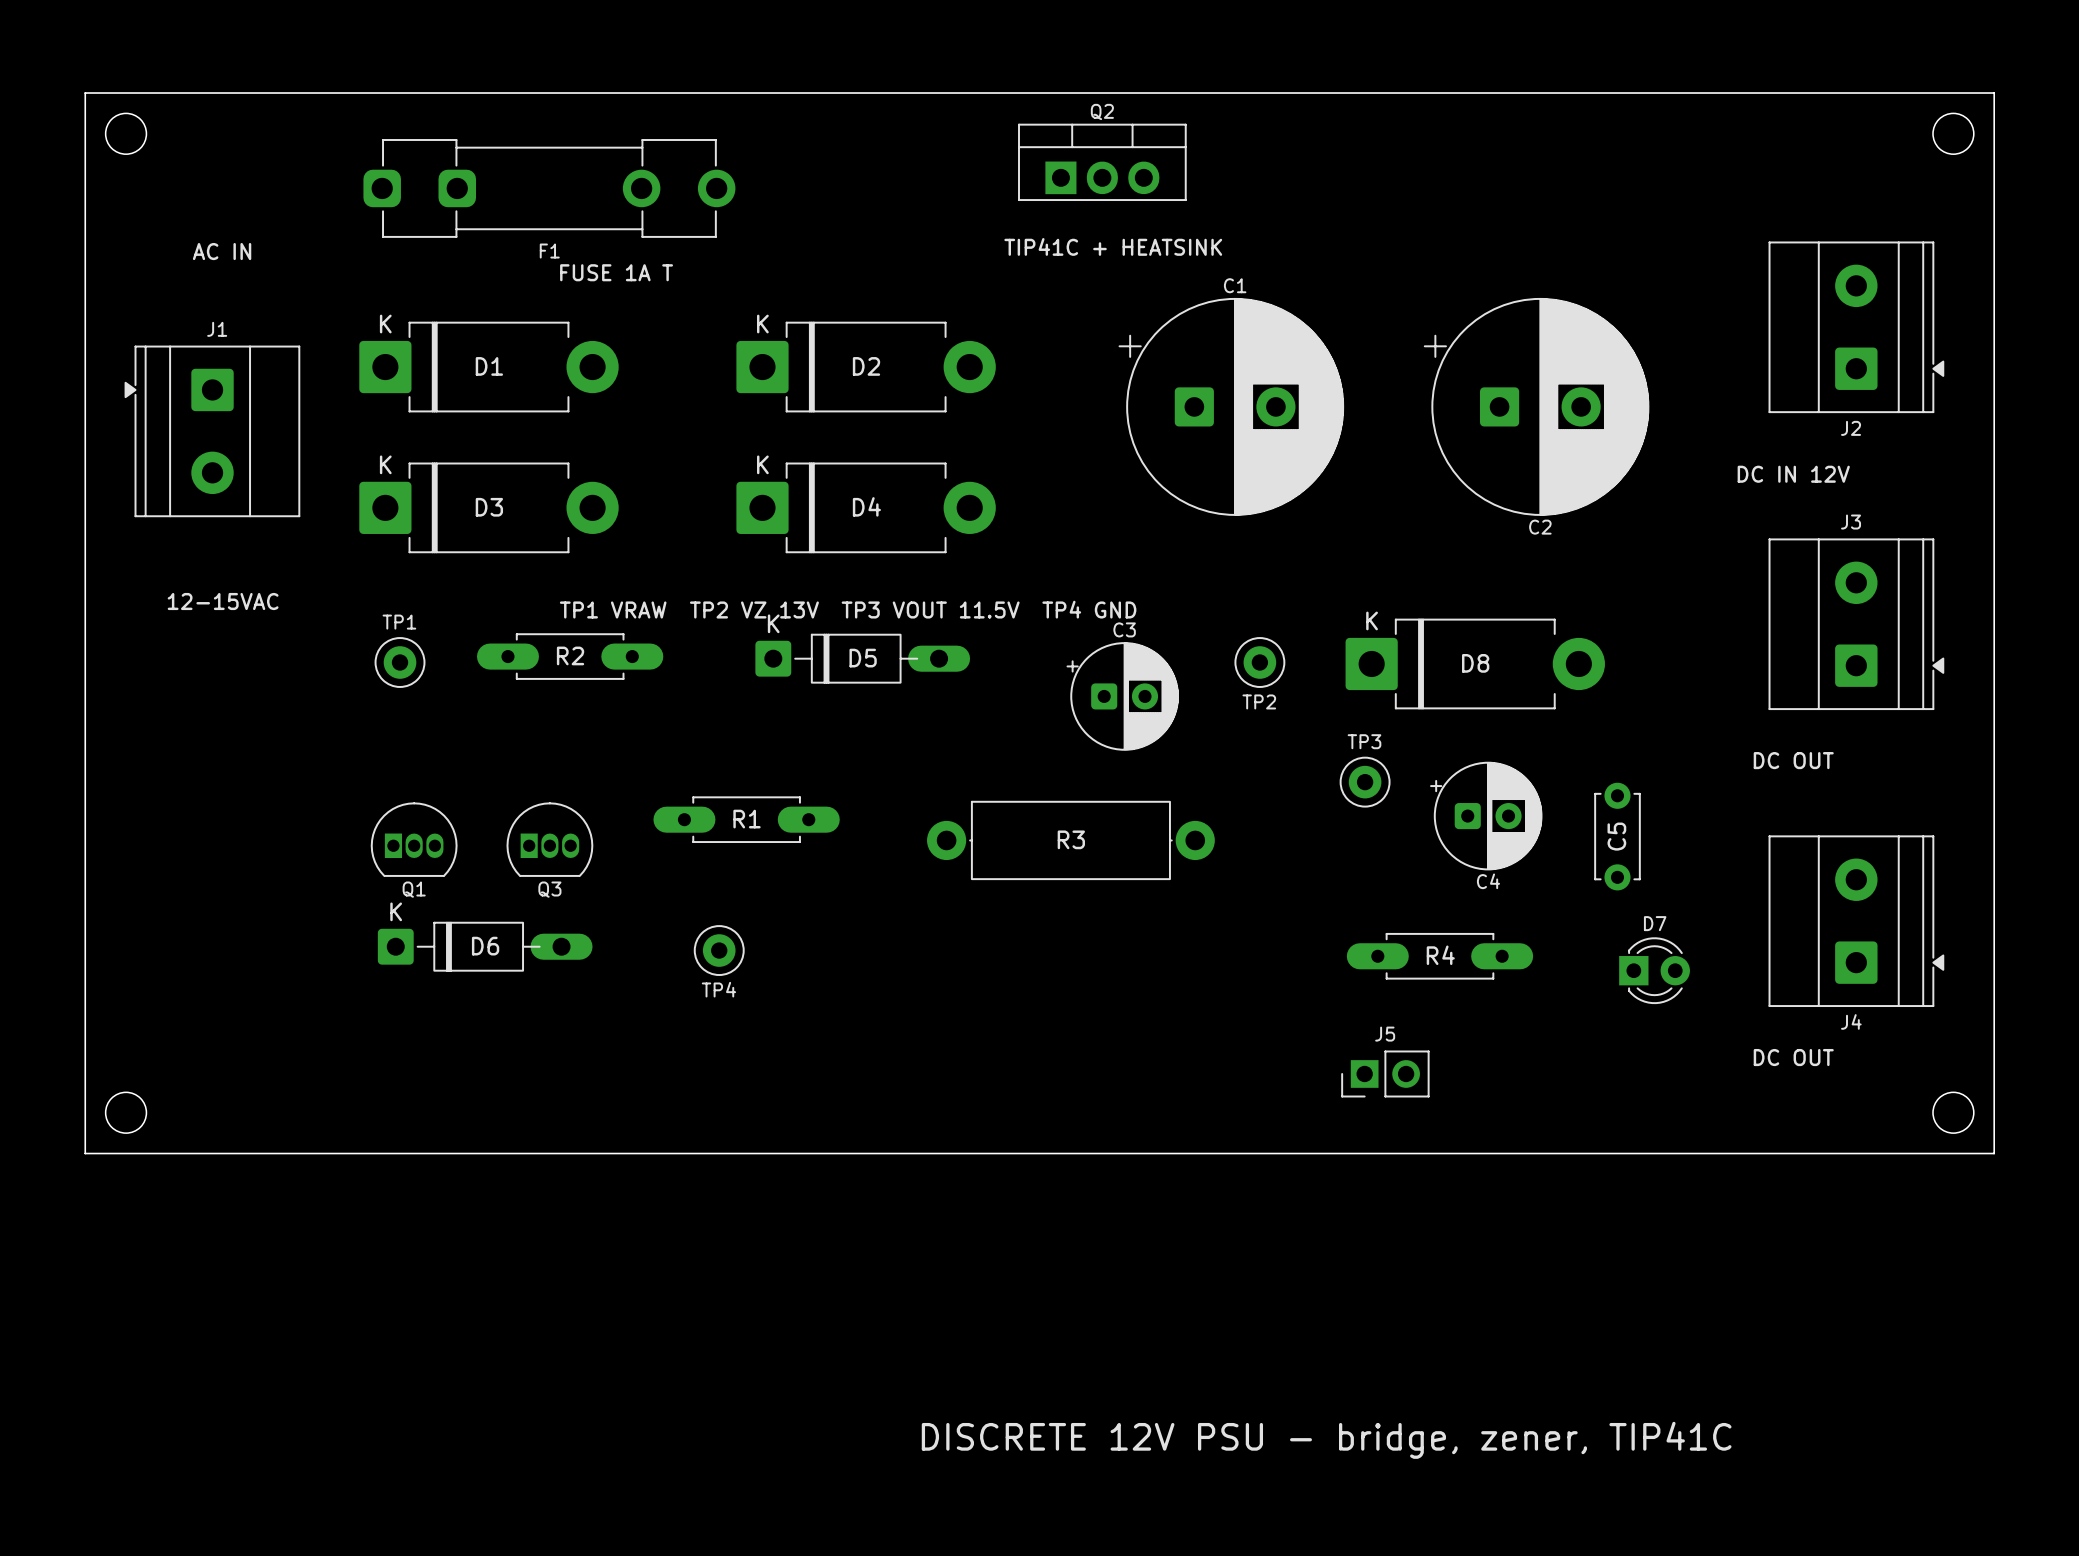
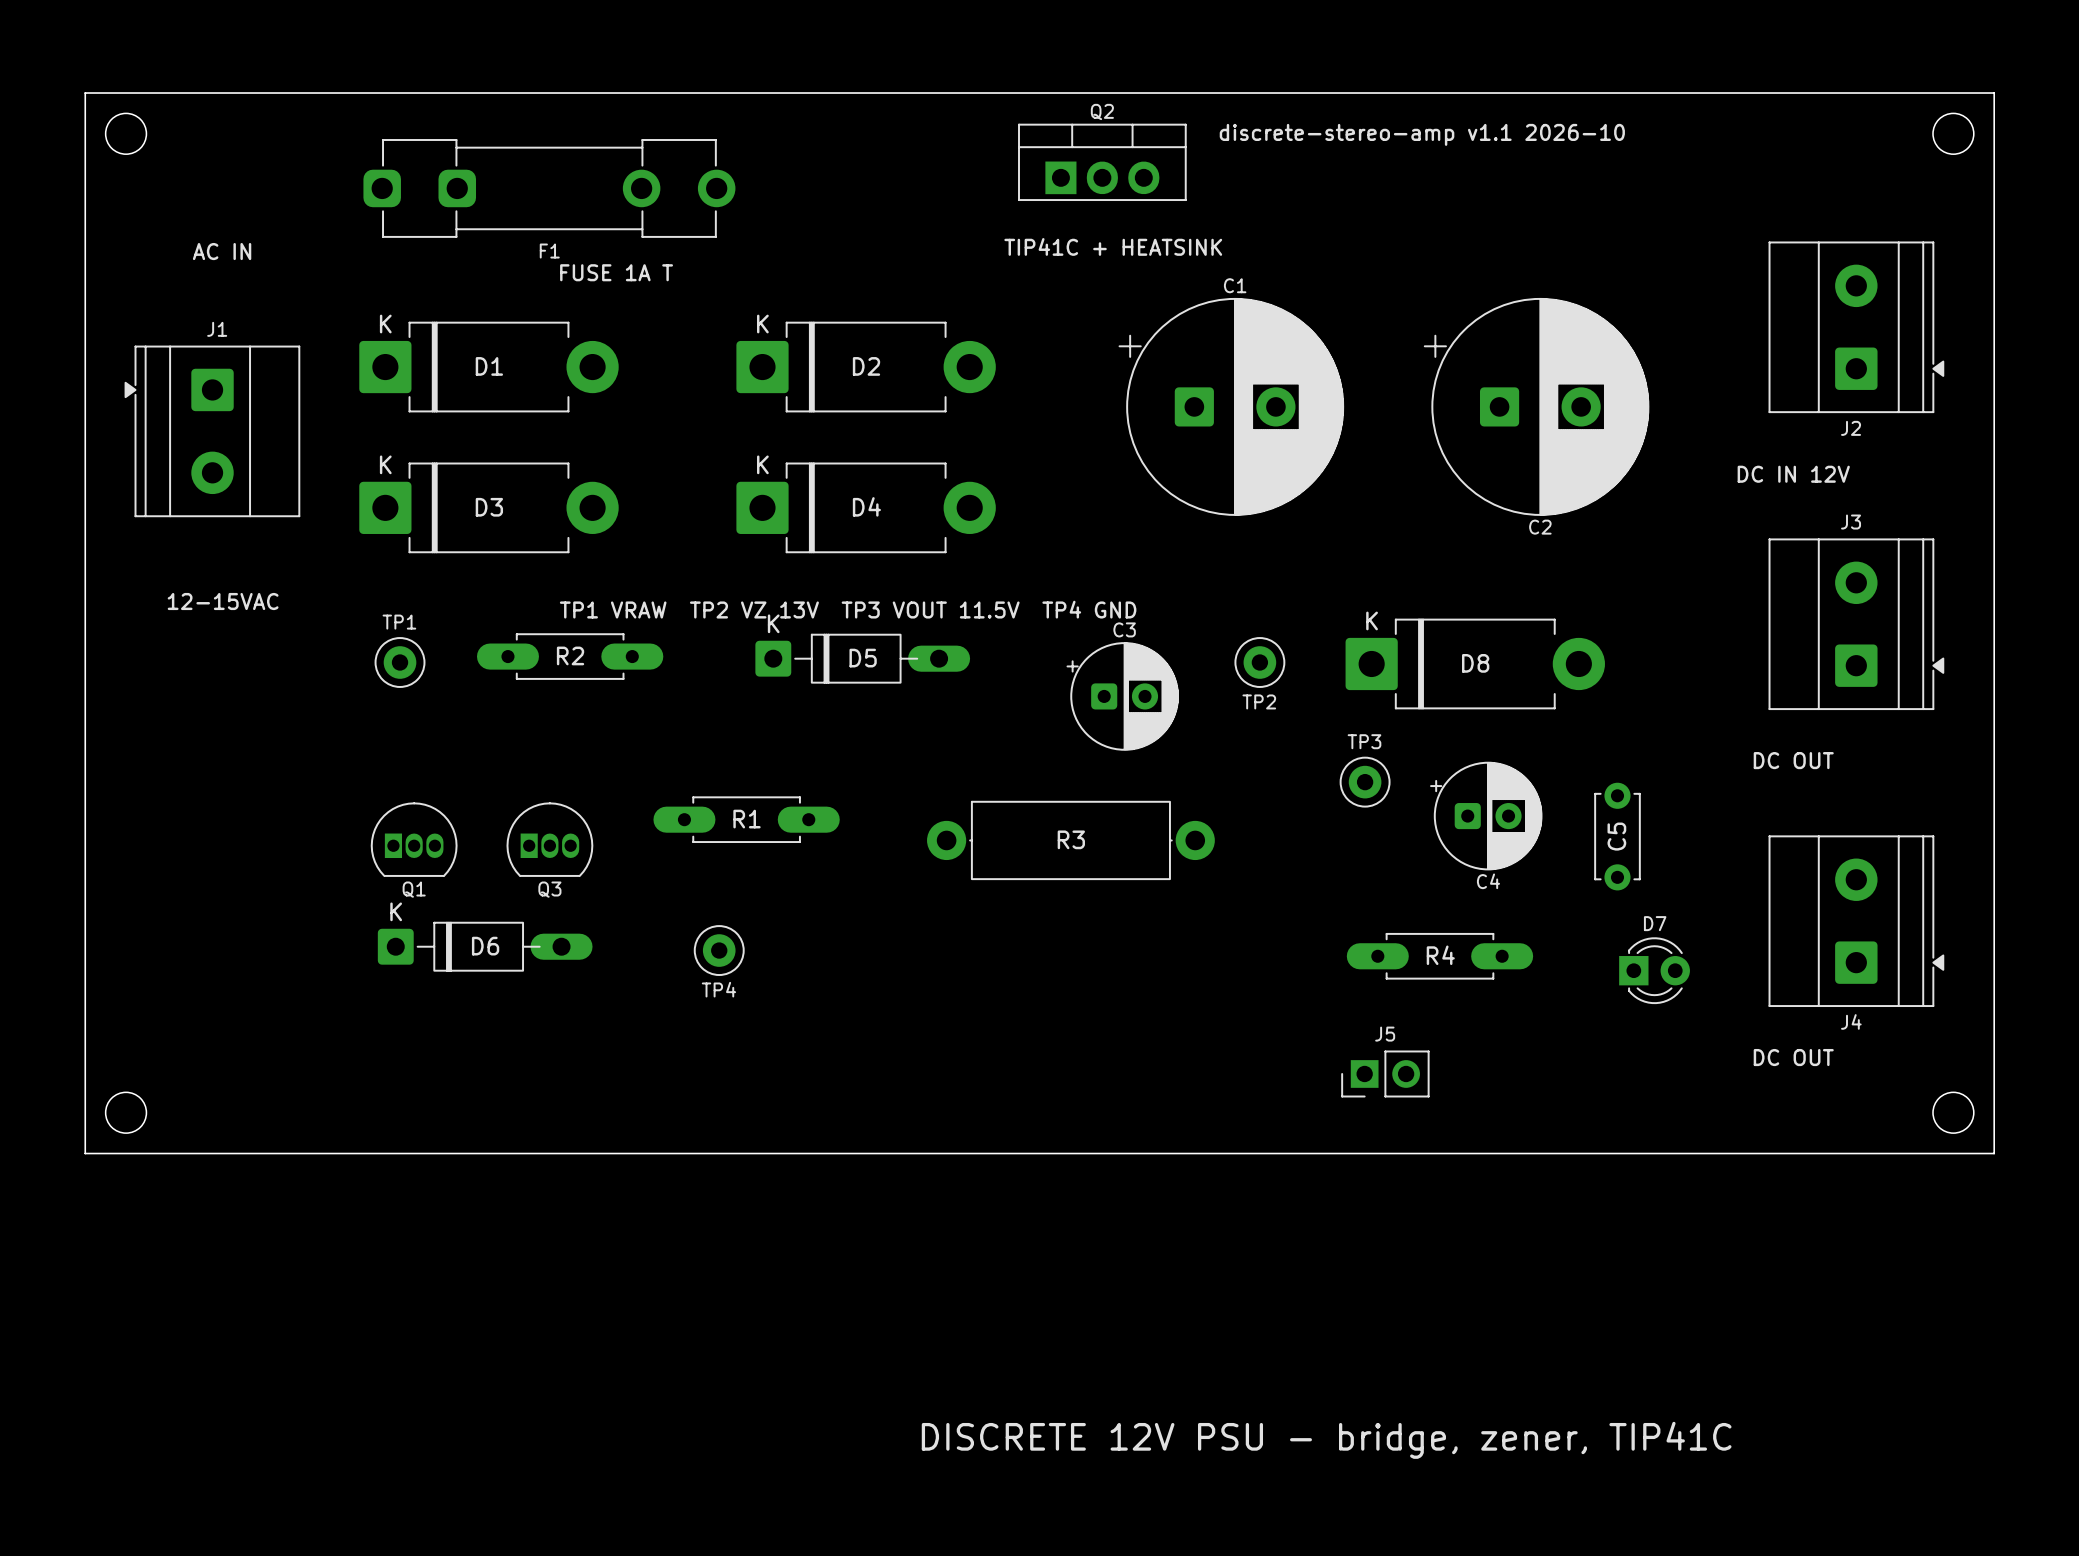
text: none -> discrete-stereo-amp v1.1 2026-10 (1422, 134)

